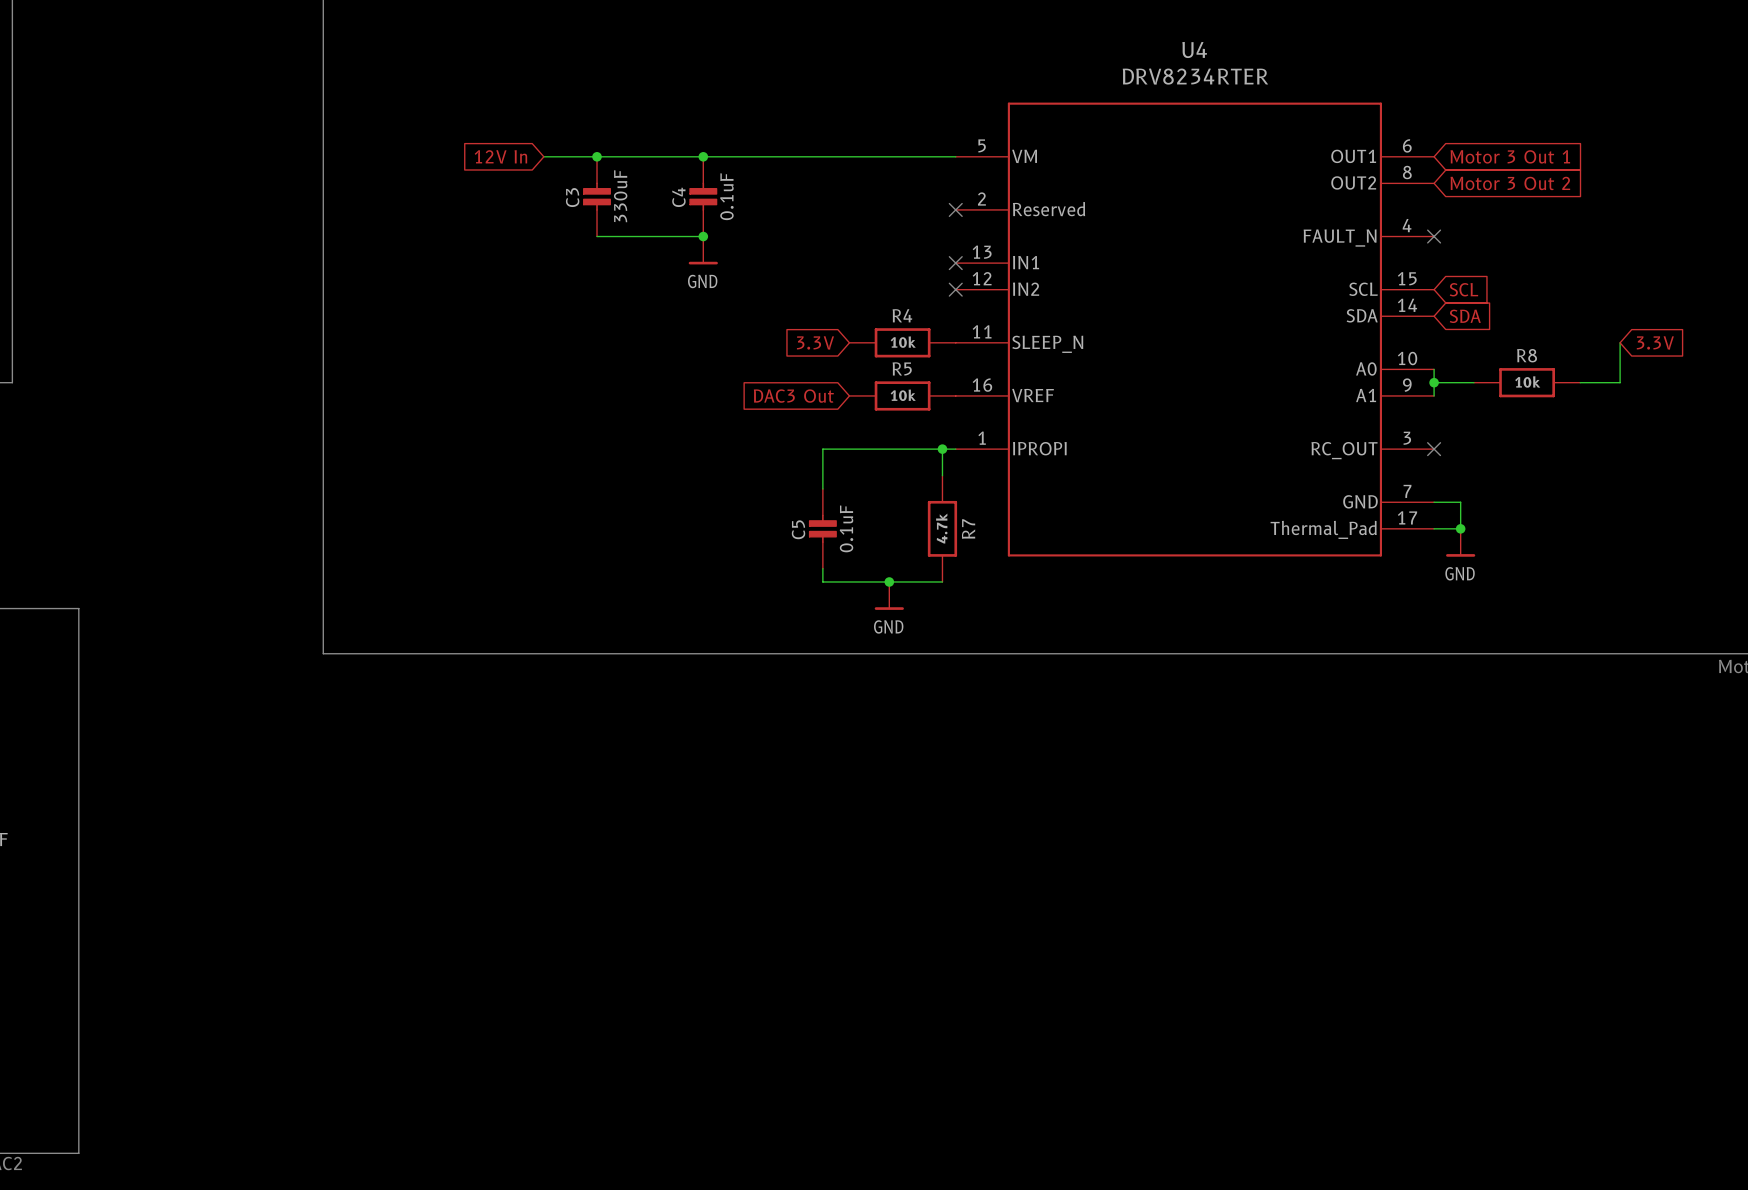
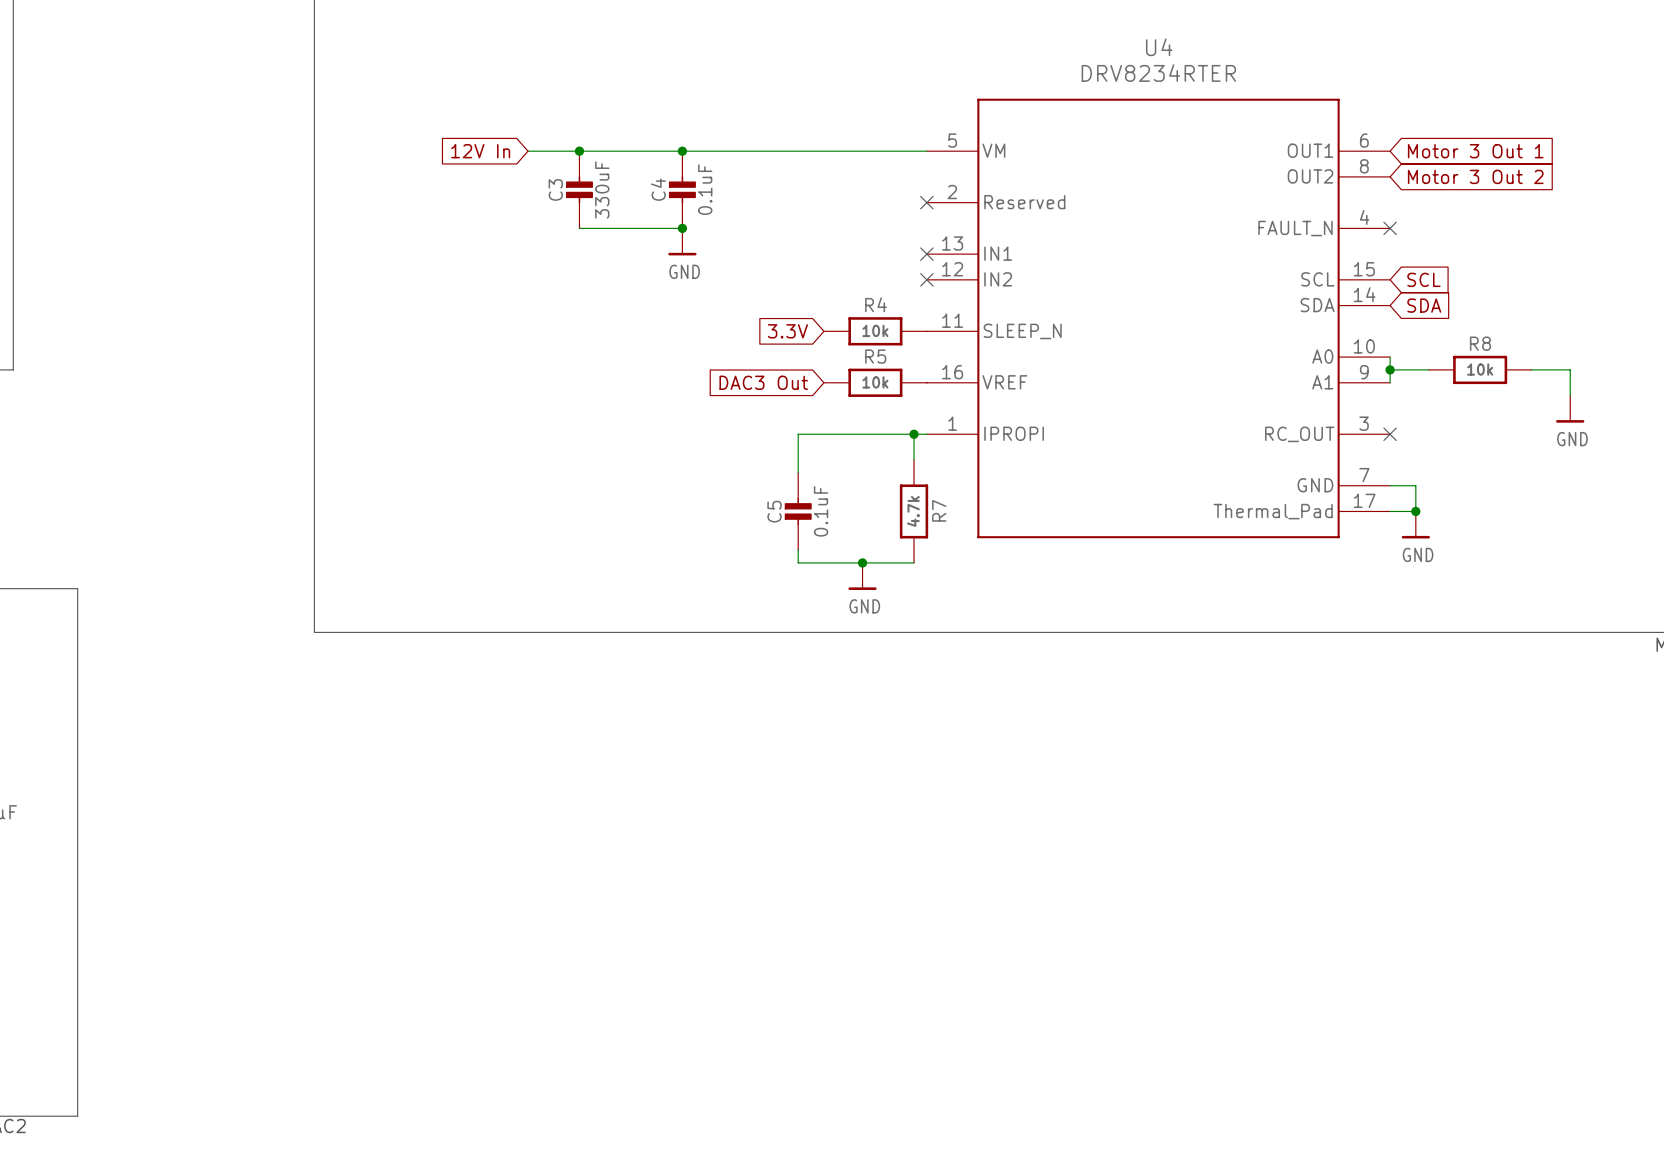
wire: (1620, 342) (1620, 382) -> (1570, 395) (1570, 369)
global label: 3.3V (1655, 342) -> none
power symbol: none -> GND (1570, 409)

